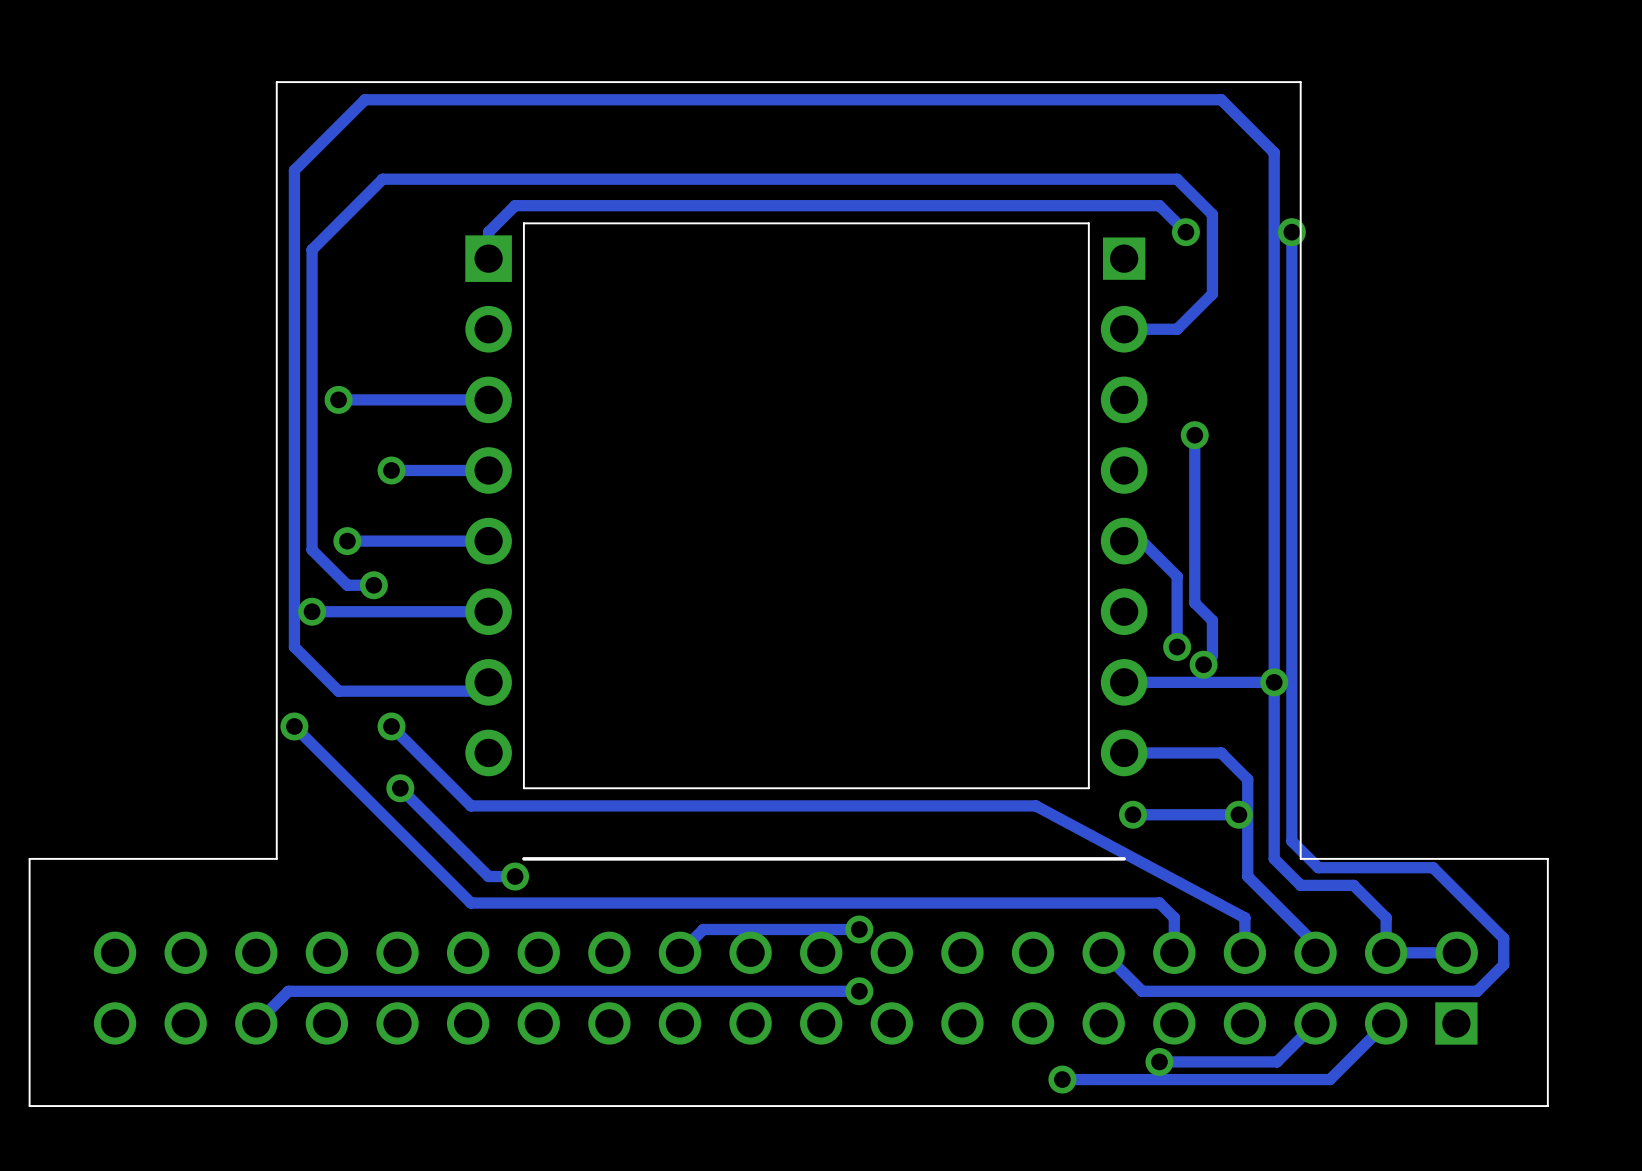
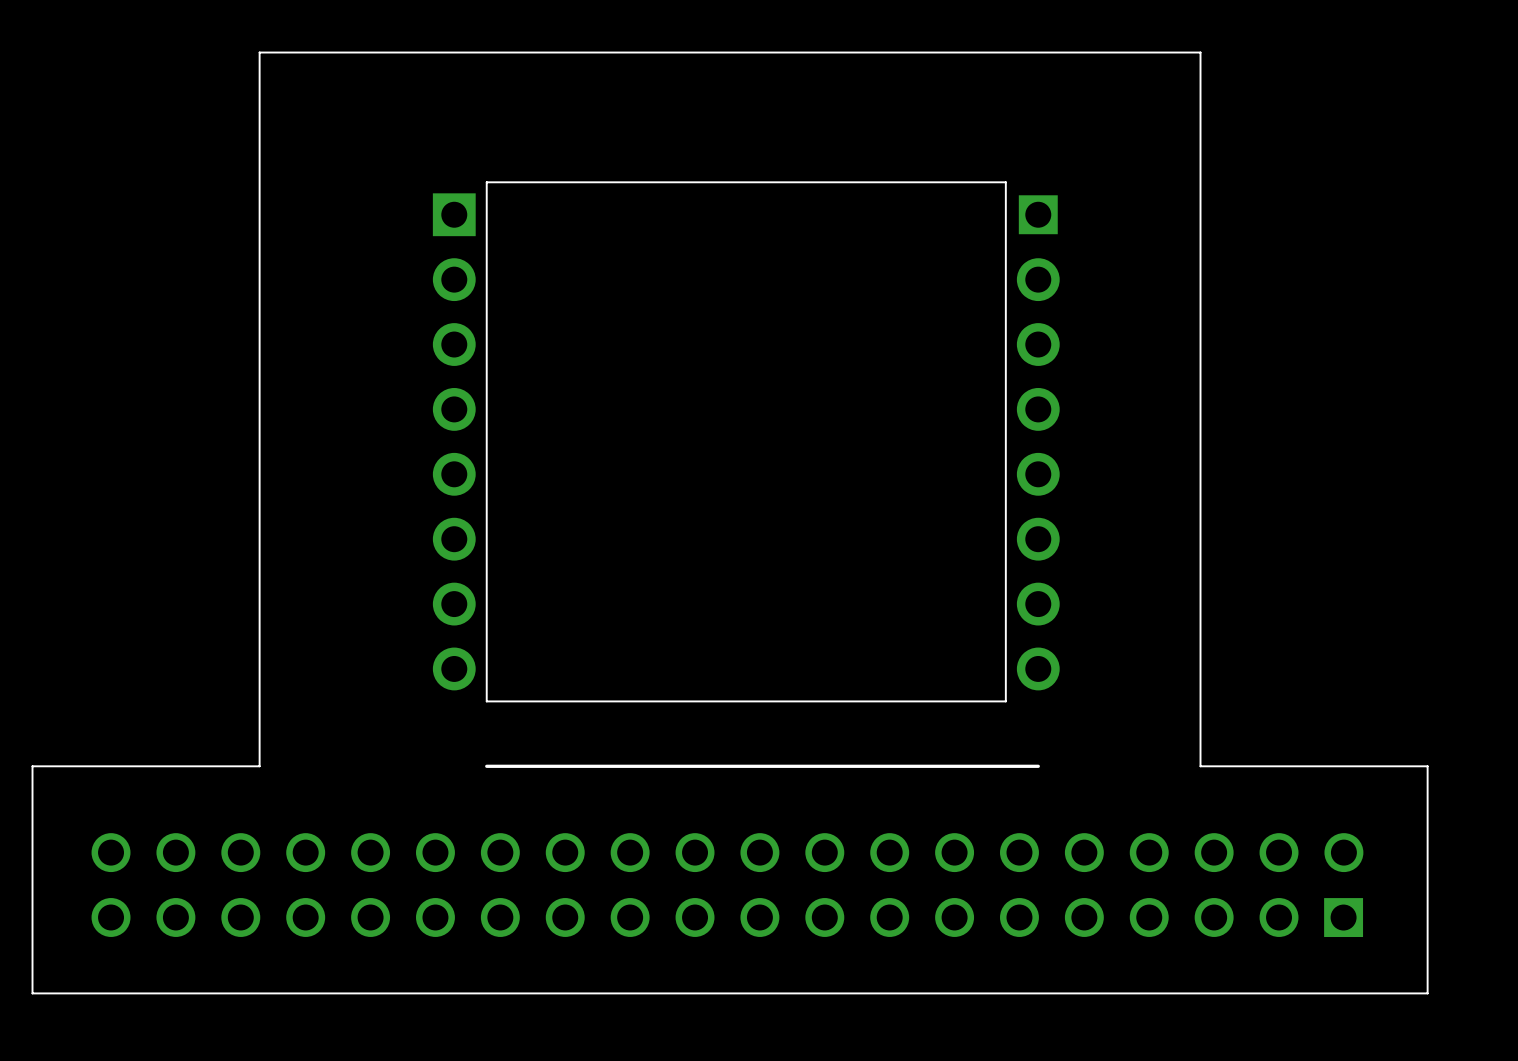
track: (1185, 232) (1159, 205) (515, 205) (488, 232) (488, 258) -> none
via: (1185, 232) -> none
track: (1291, 232) (1291, 841) (1318, 867) (1433, 867) (1503, 938) (1503, 964) (1477, 991) (1142, 991) (1103, 952) -> none
via: (1291, 232) -> none
track: (1124, 329) (1177, 329) (1212, 293) (1212, 214) (1177, 179) (382, 179) (312, 249) (312, 549) (347, 585) (373, 585) -> none
via: (338, 399) -> none
track: (488, 399) (338, 399) -> none
track: (1194, 435) (1194, 602) (1212, 620) (1212, 655) (1203, 664) -> none
via: (1194, 435) -> none
via: (391, 470) -> none
track: (488, 470) (391, 470) -> none
via: (347, 541) -> none
track: (488, 541) (347, 541) -> none
track: (1124, 541) (1141, 541) (1177, 576) (1177, 647) -> none
via: (373, 585) -> none
via: (312, 611) -> none
track: (488, 611) (312, 611) -> none
via: (1177, 647) -> none
via: (1203, 664) -> none
track: (488, 682) (479, 691) (338, 691) (294, 647) (294, 170) (365, 99) (1221, 99) (1274, 152) (1274, 858) (1300, 885) (1353, 885) (1386, 917) (1386, 952) (1456, 952) -> none
track: (1274, 682) (1124, 682) -> none
via: (1274, 682) -> none
track: (294, 726) (470, 903) (1159, 903) (1174, 917) (1174, 952) -> none
via: (294, 726) -> none
track: (391, 726) (470, 805) (1035, 805) (1244, 917) (1244, 952) -> none
via: (391, 726) -> none
track: (1124, 752) (1221, 752) (1247, 779) (1247, 876) (1315, 944) (1315, 952) -> none
track: (400, 788) (488, 876) (515, 876) -> none
via: (400, 788) -> none
via: (1132, 814) -> none
track: (1238, 814) (1132, 814) -> none
via: (1238, 814) -> none
via: (515, 876) -> none
track: (859, 929) (703, 929) (679, 952) -> none
via: (859, 929) -> none
track: (859, 991) (288, 991) (256, 1023) -> none
via: (859, 991) -> none
track: (1315, 1023) (1277, 1061) (1159, 1061) -> none
track: (1386, 1023) (1330, 1079) (1062, 1079) -> none
via: (1159, 1061) -> none
via: (1062, 1079) -> none

